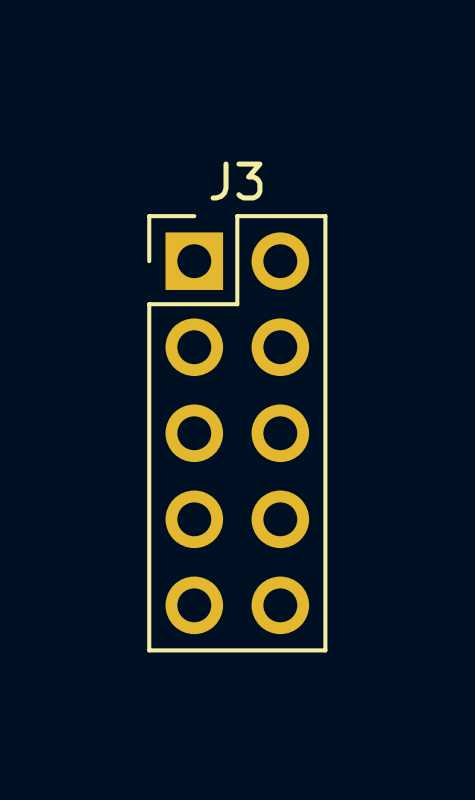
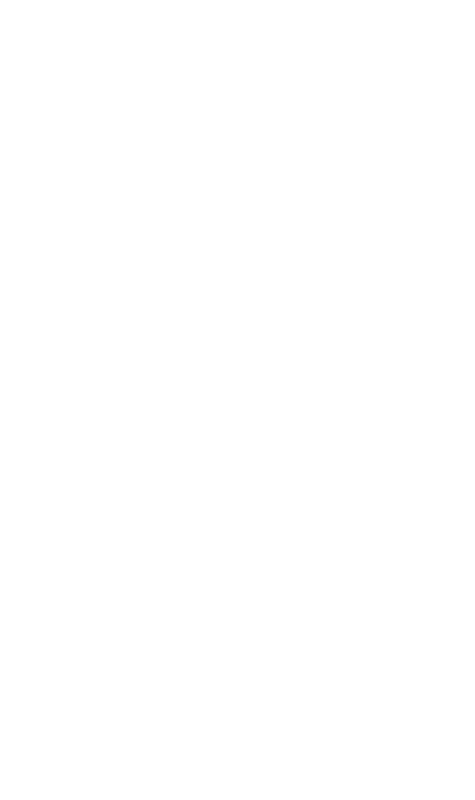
J3: (237, 433) -> none

